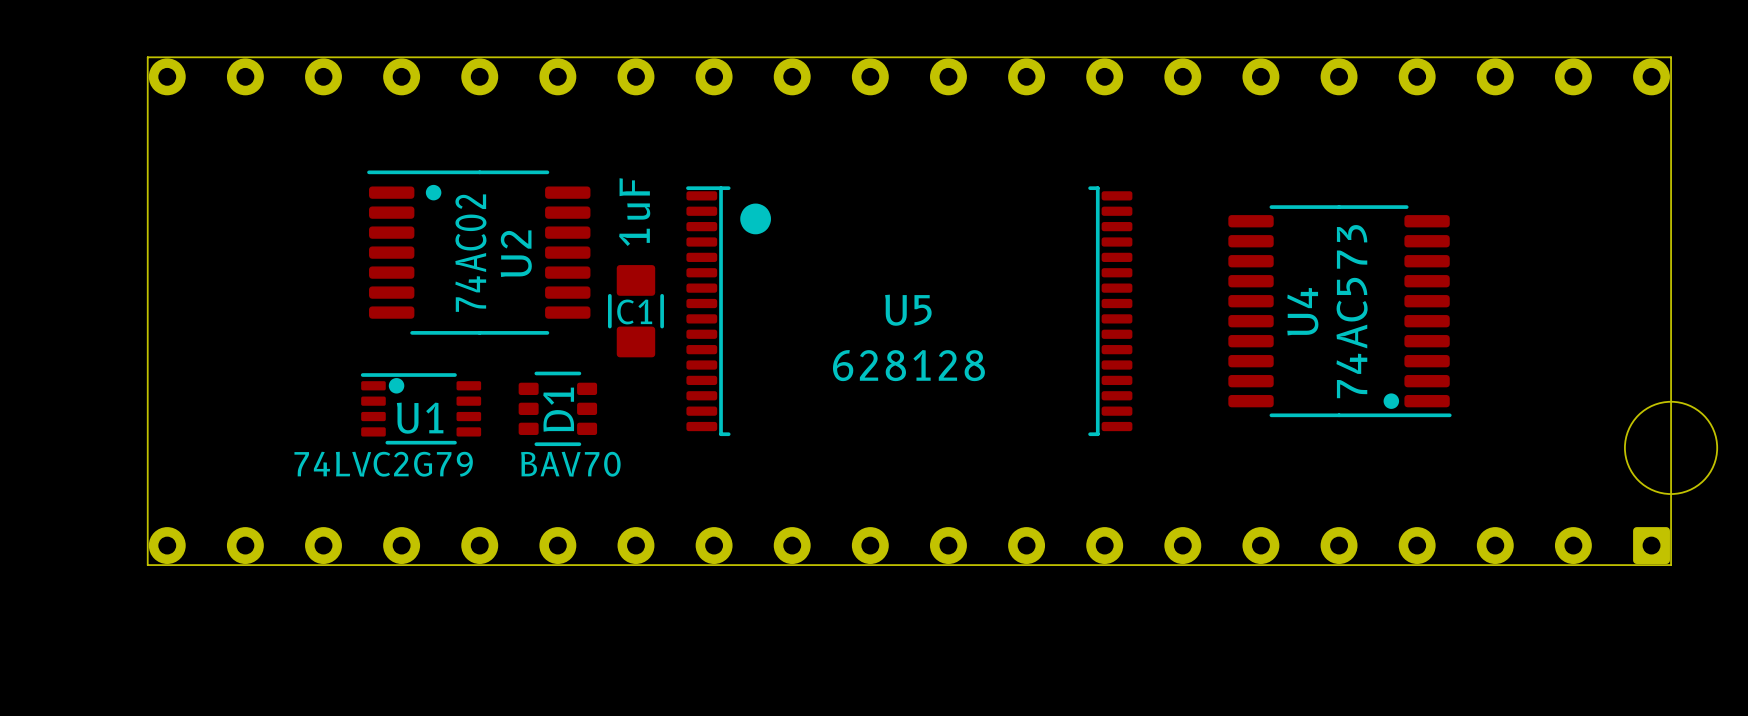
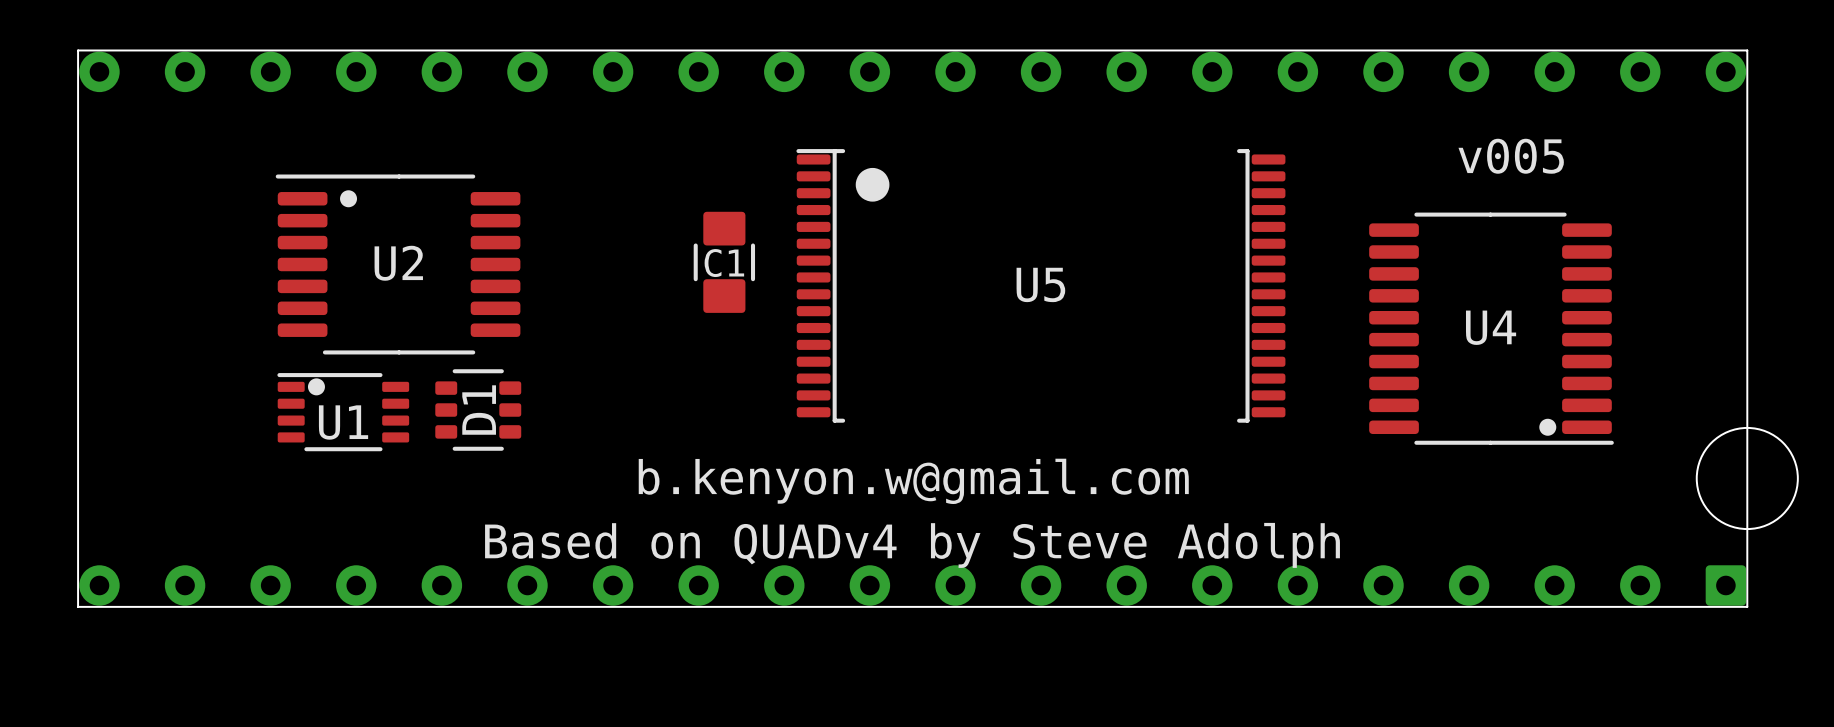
text: none -> v005 (1511, 156)
C1 value: 1uF (634, 212) -> none
U2 position: (478, 252) -> (398, 264)
U2 value: 74AC02 (470, 253) -> none
U2 name rotation: 0° (516, 253) -> 90° clockwise (398, 263)
C1 position: (635, 311) -> (724, 262)
U5 position: (909, 311) -> (1040, 285)
U4 name rotation: 0° (1302, 311) -> 90° clockwise (1491, 327)
U4 position: (1339, 311) -> (1491, 328)
U4 value: 74AC573 (1352, 311) -> none
U5 value: 628128 (908, 365) -> none
U1 position: (420, 408) -> (343, 412)
D1 position: (557, 408) -> (478, 410)
text: none -> b.kenyon.w@gmail.com (913, 481)
U1 value: 74LVC2G79 (383, 464) -> none
D1 value: BAV70 (570, 464) -> none
text: none -> Based on QUADv4 by Steve Adolph (912, 545)

